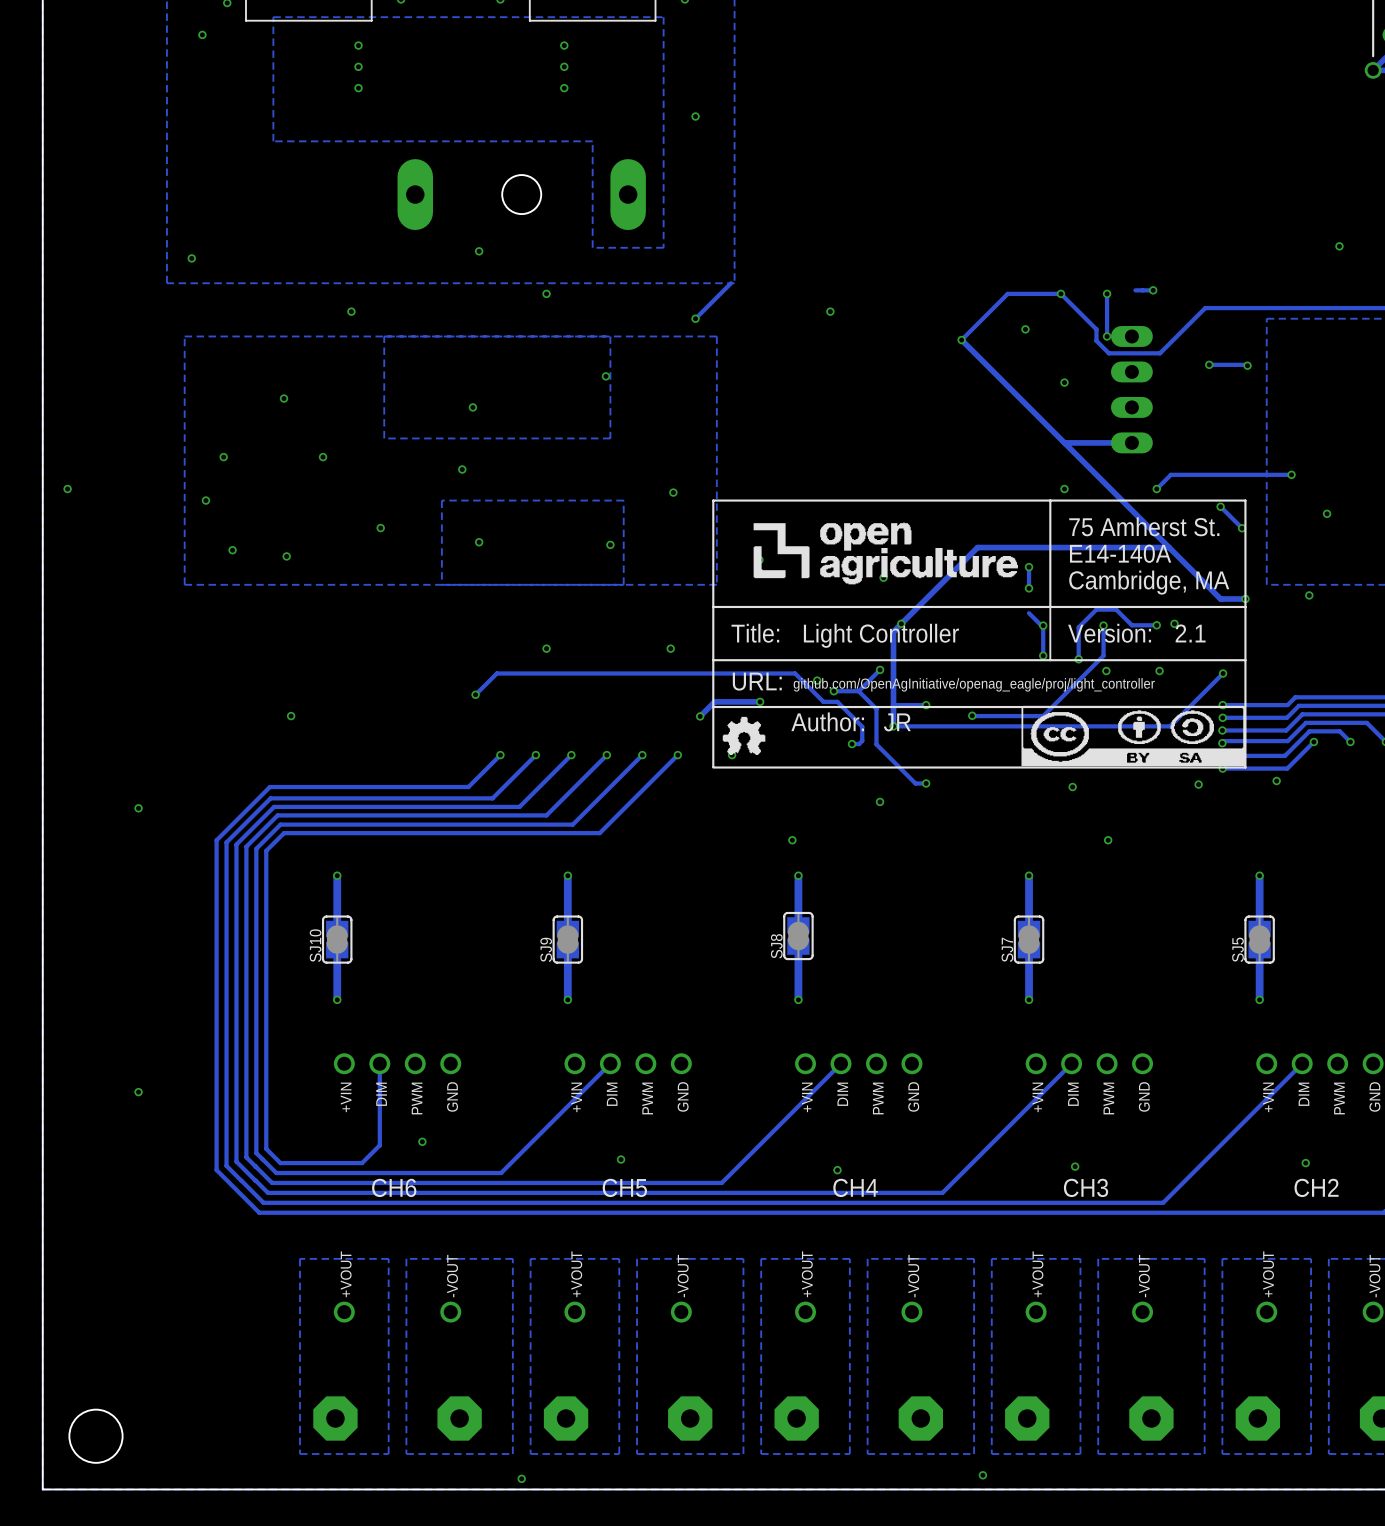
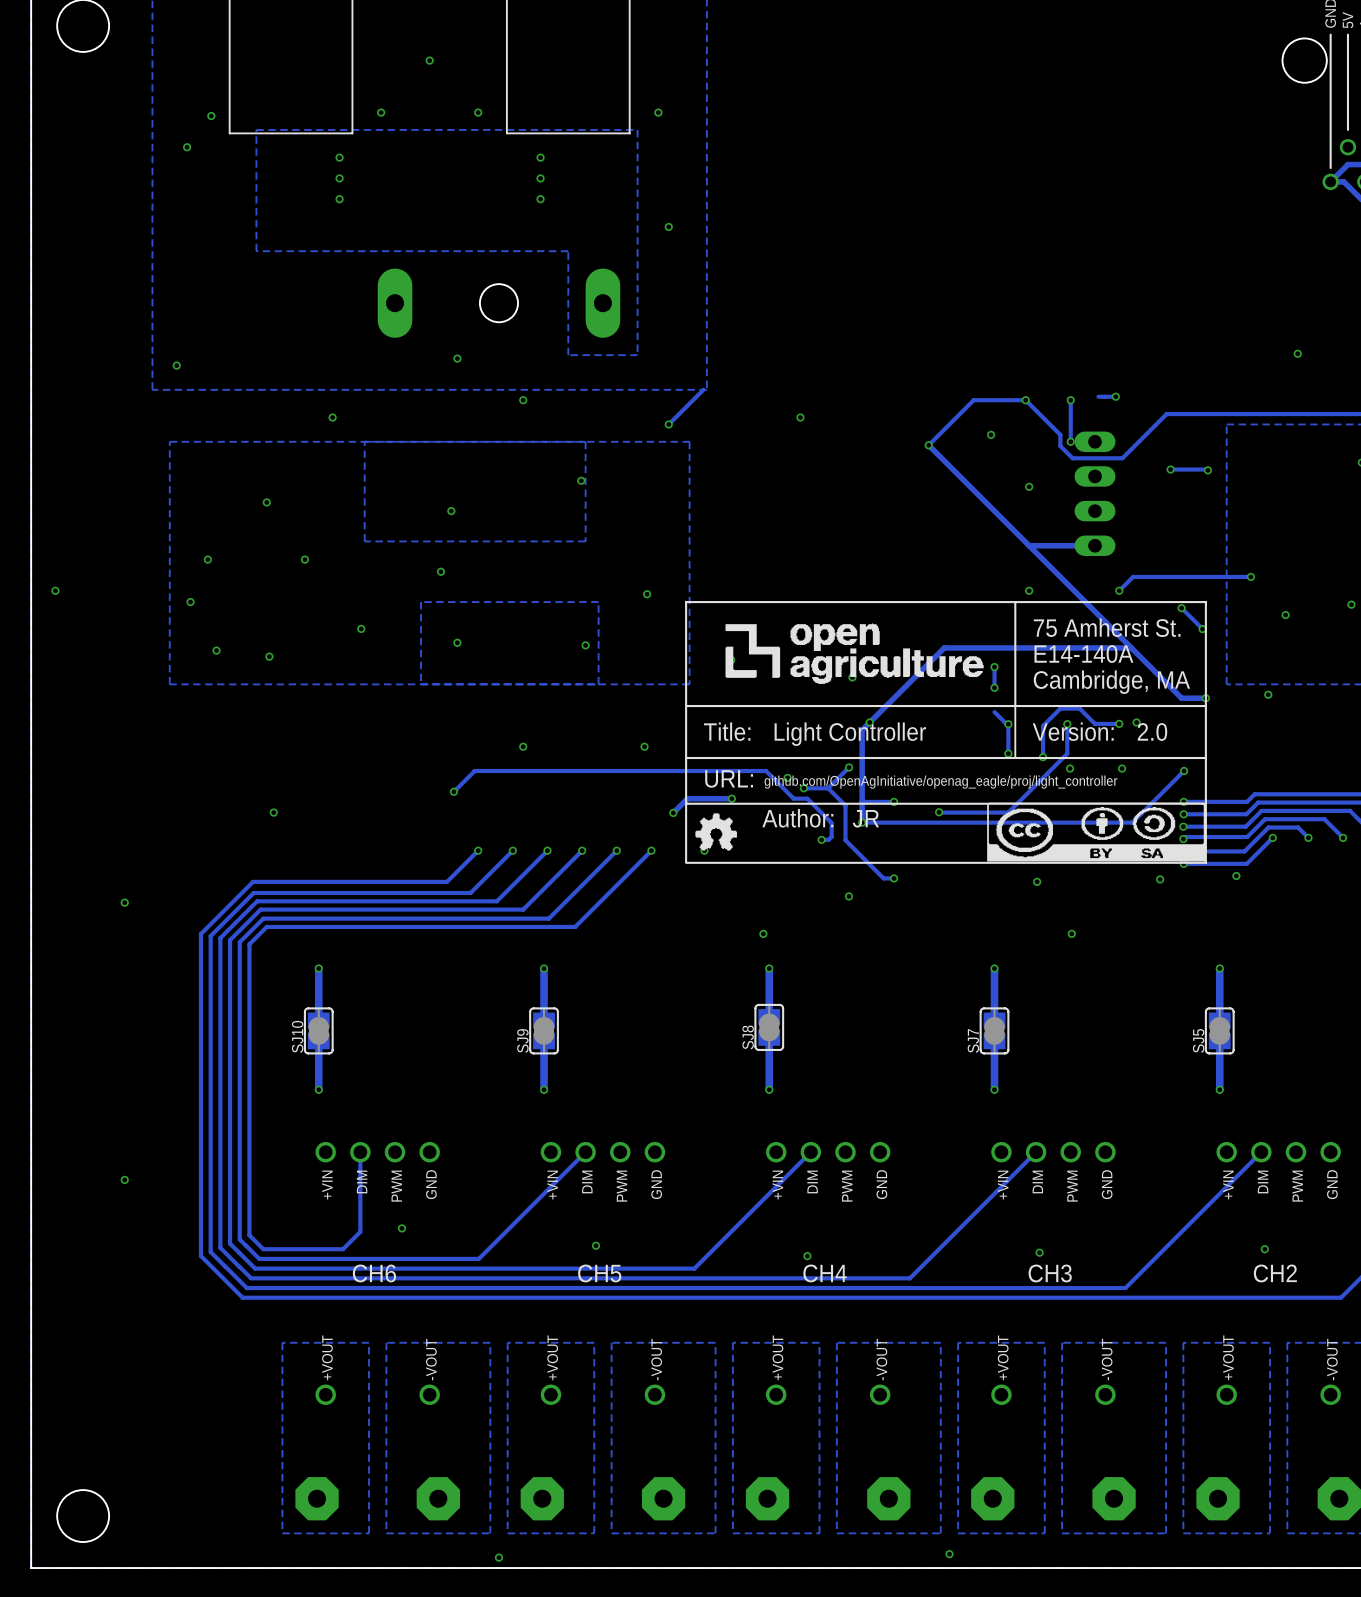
drawing shape: [712, 499, 1247, 769] -> [685, 601, 1207, 864]

